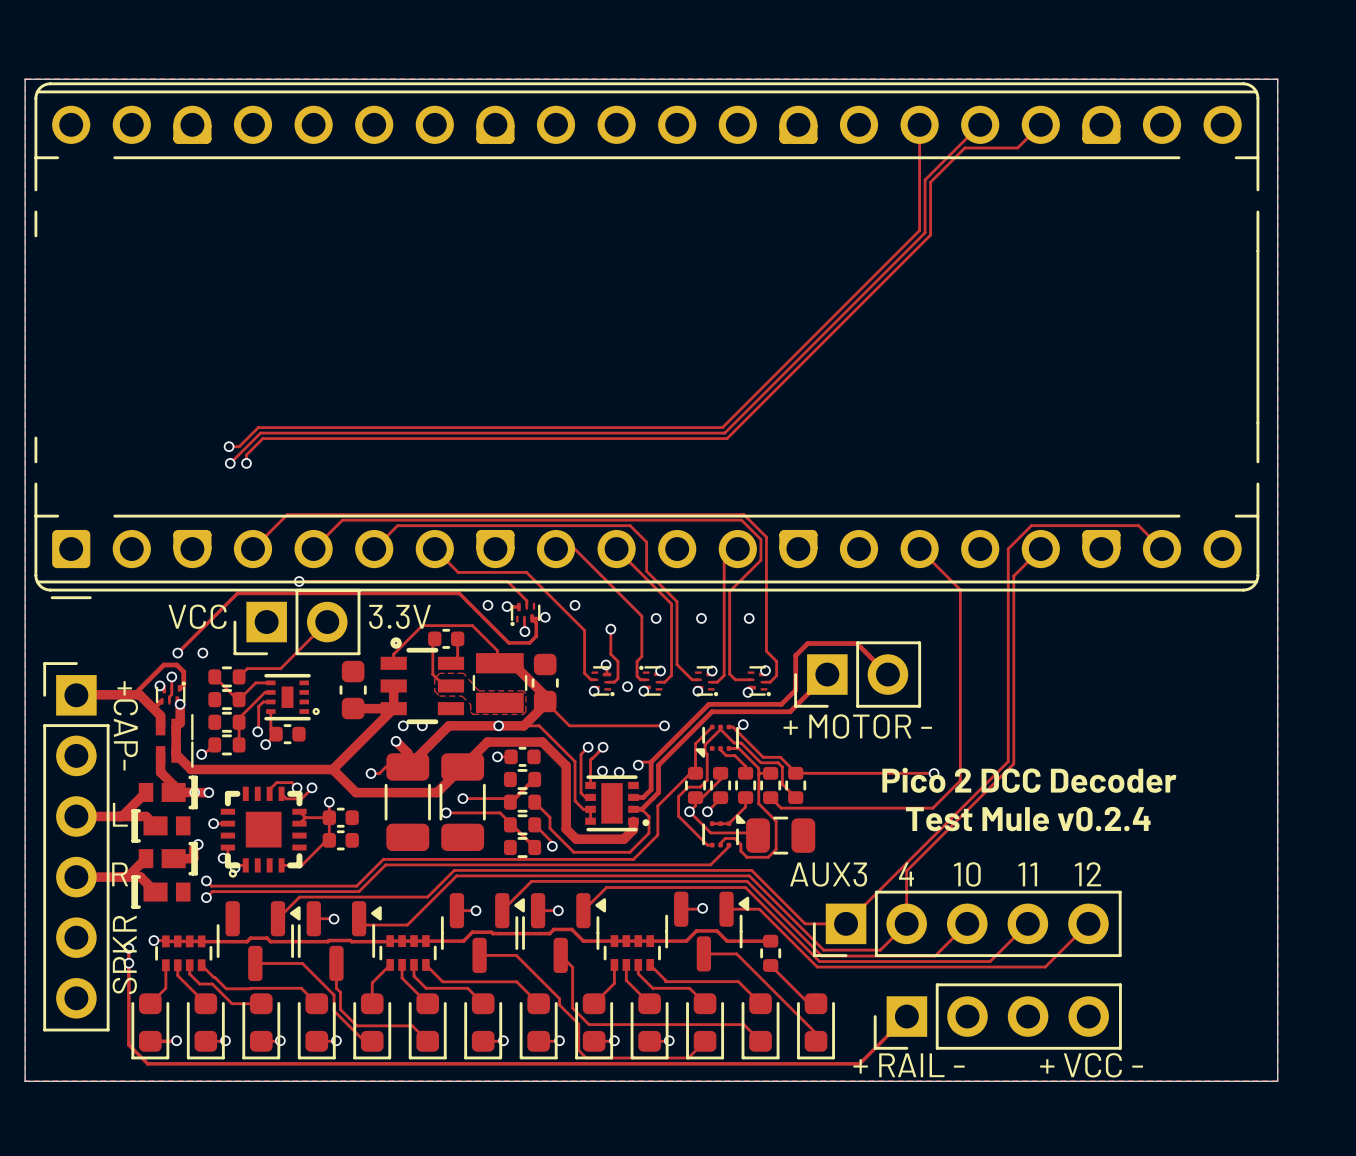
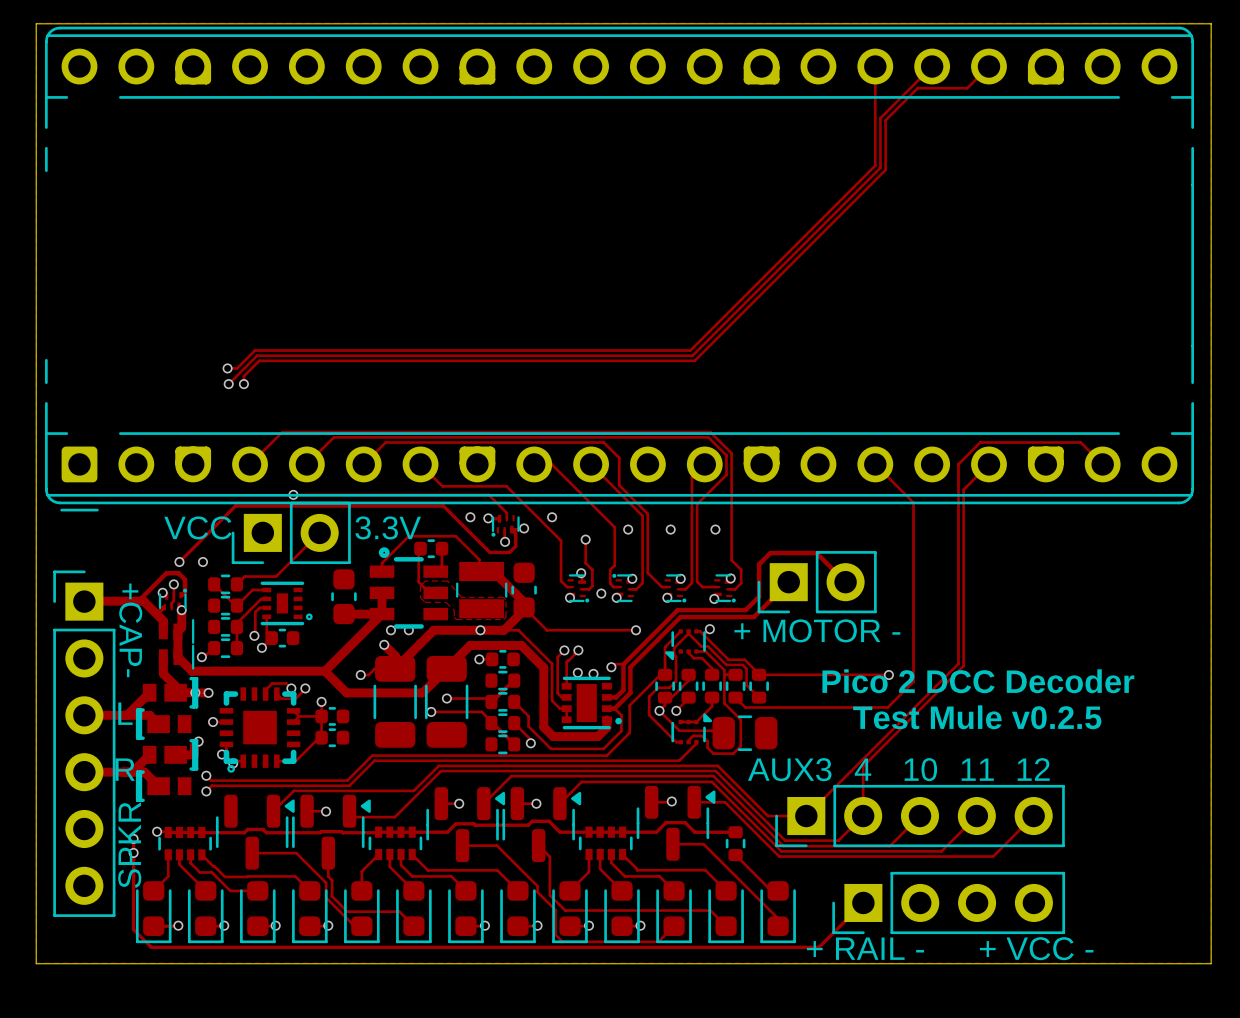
text: Test Mule v0.2.4 (1028, 819) -> Test Mule v0.2.5 (977, 717)

